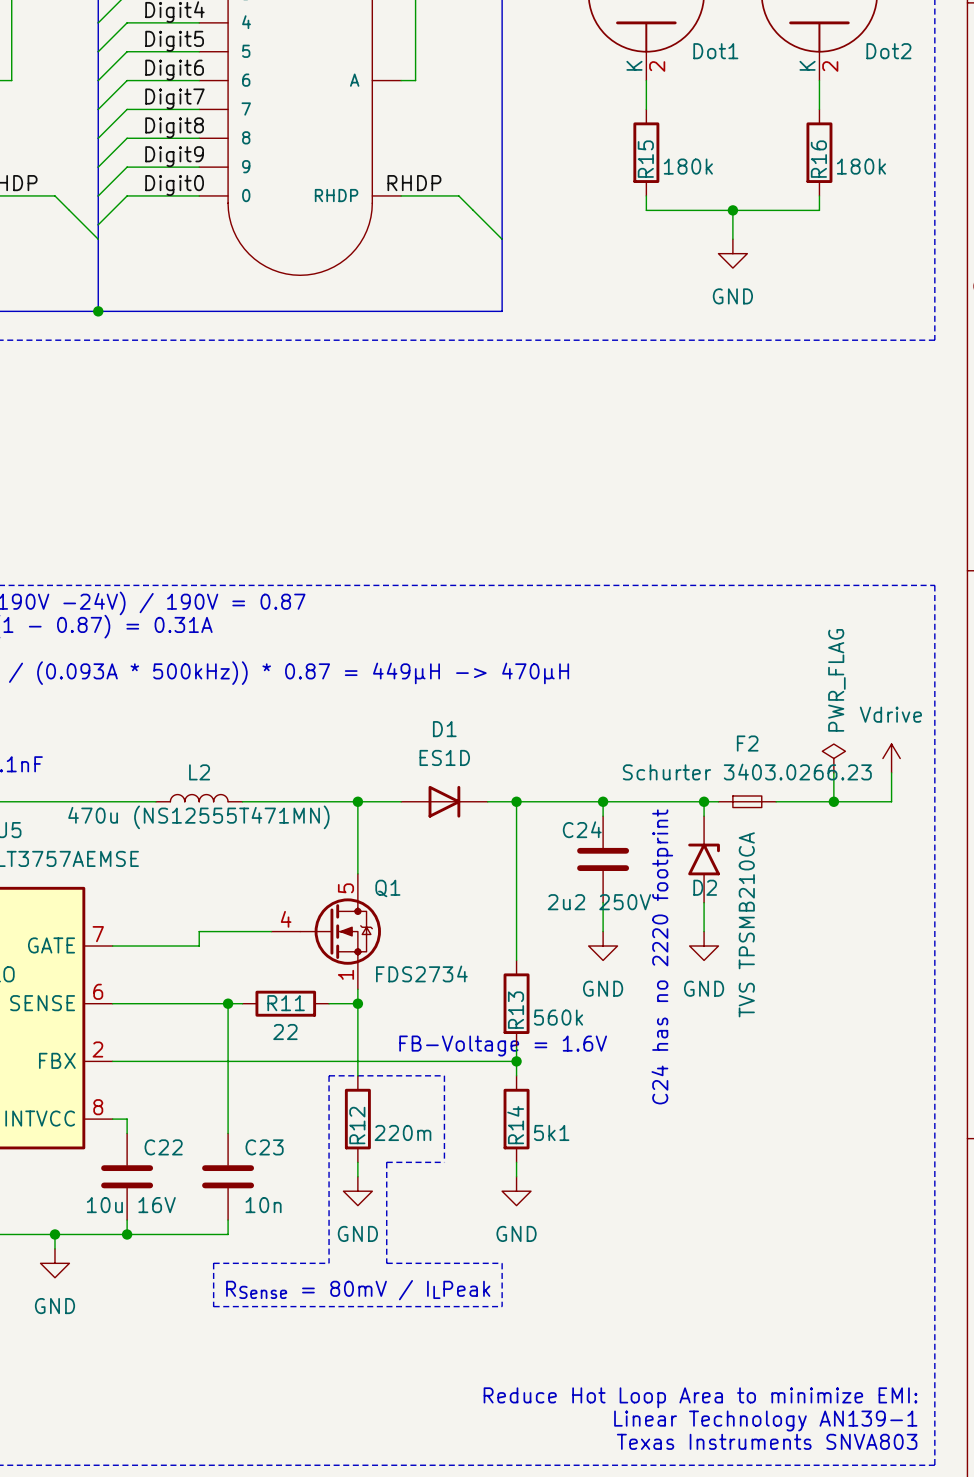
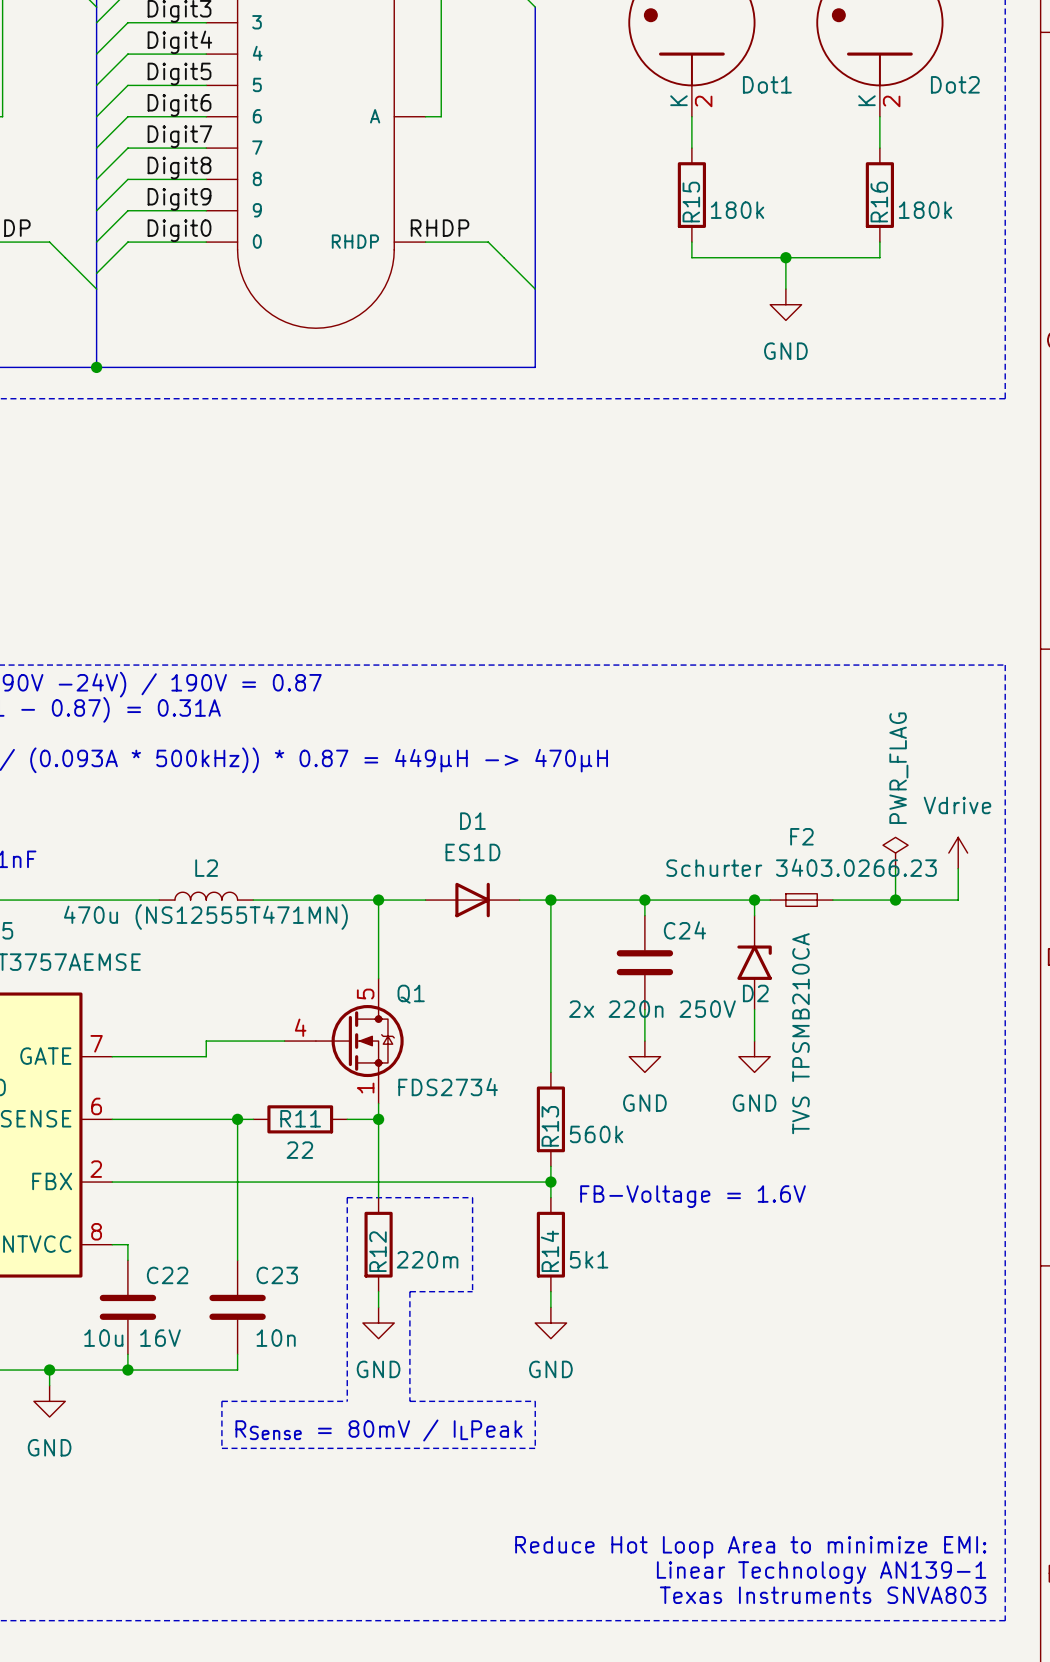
C24 name position: C24 (582, 829) -> C24 (684, 930)
C24 value: 2u2 250V (599, 902) -> 2x 220n 250V (652, 1009)
text: C24 has no 2220 footprint (662, 956) -> none
text position: FB-Voltage = 1.6V (503, 1045) -> FB-Voltage = 1.6V (693, 1196)

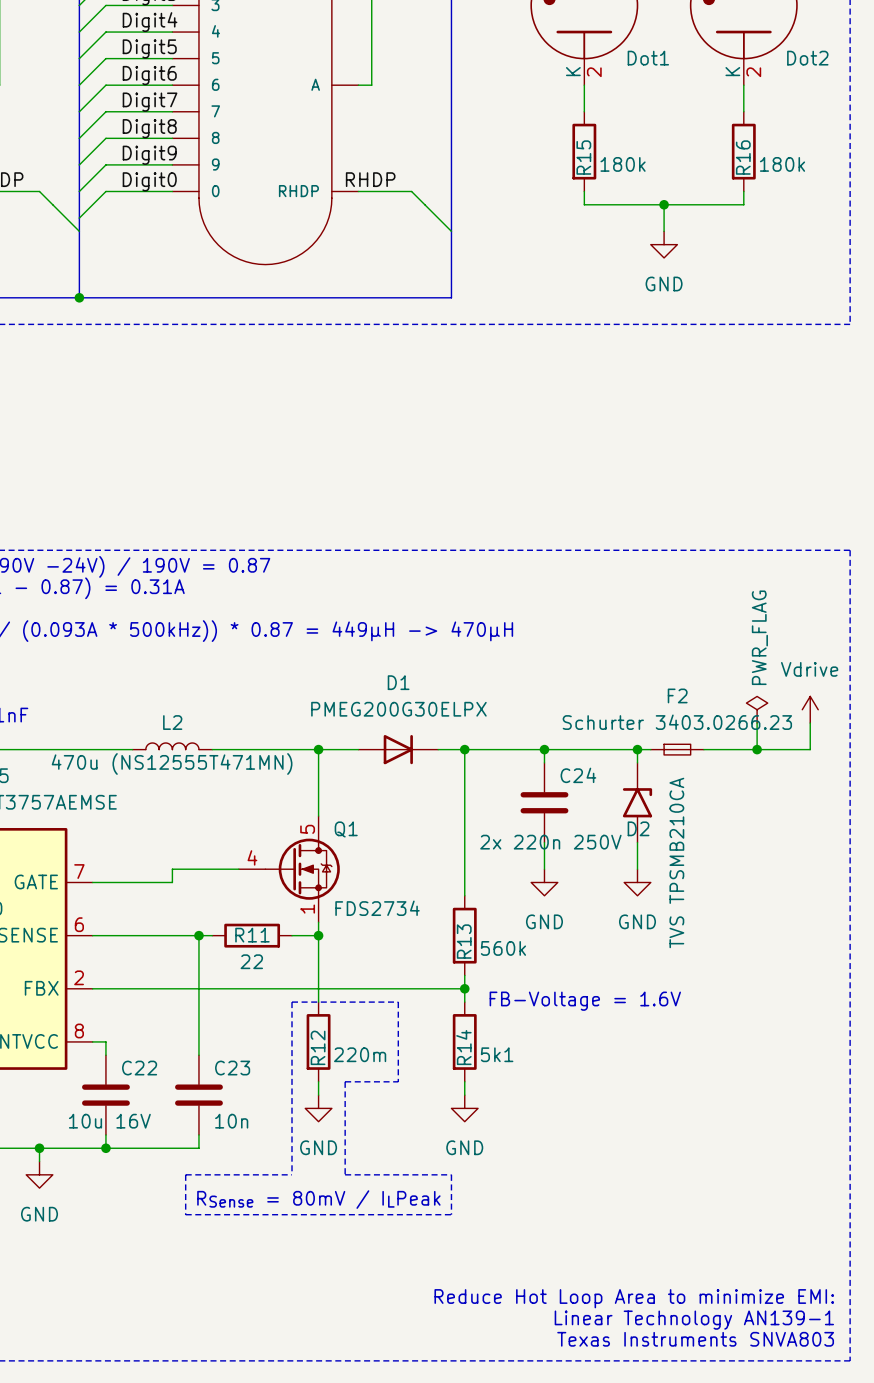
D1 value: ES1D (472, 852) -> PMEG200G30ELPX (398, 709)

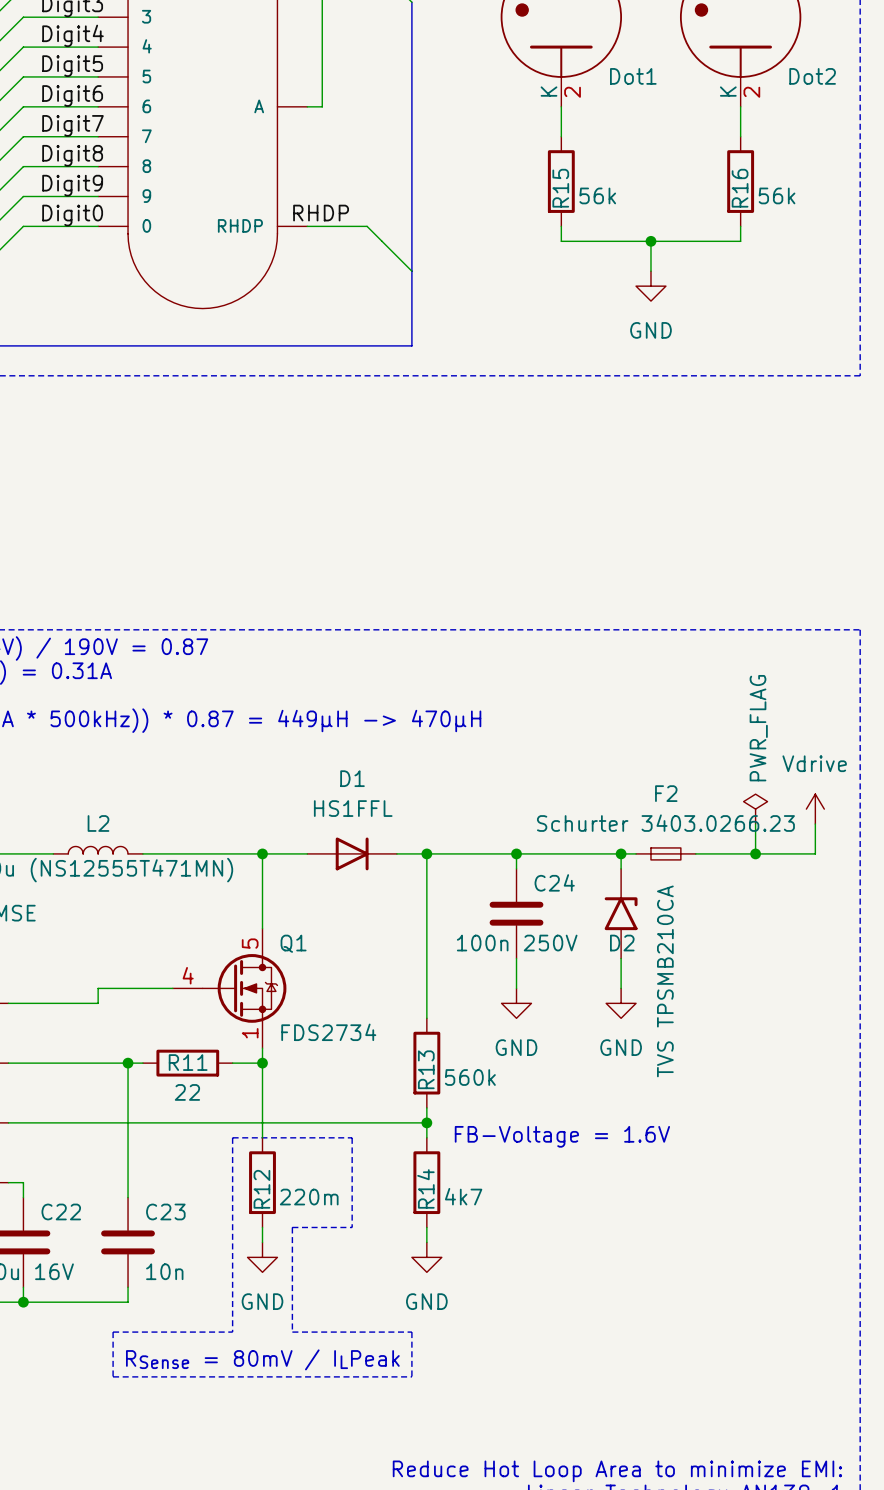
R15 value: 180k (623, 164) -> 56k (597, 195)
R16 value: 180k (782, 164) -> 56k (777, 195)
D1 value: PMEG200G30ELPX (398, 709) -> HS1FFL (353, 808)
C24 value: 2x 220n 250V (550, 842) -> 100n 250V (517, 943)
R14 value: 5k1 (497, 1054) -> 4k7 (463, 1196)

